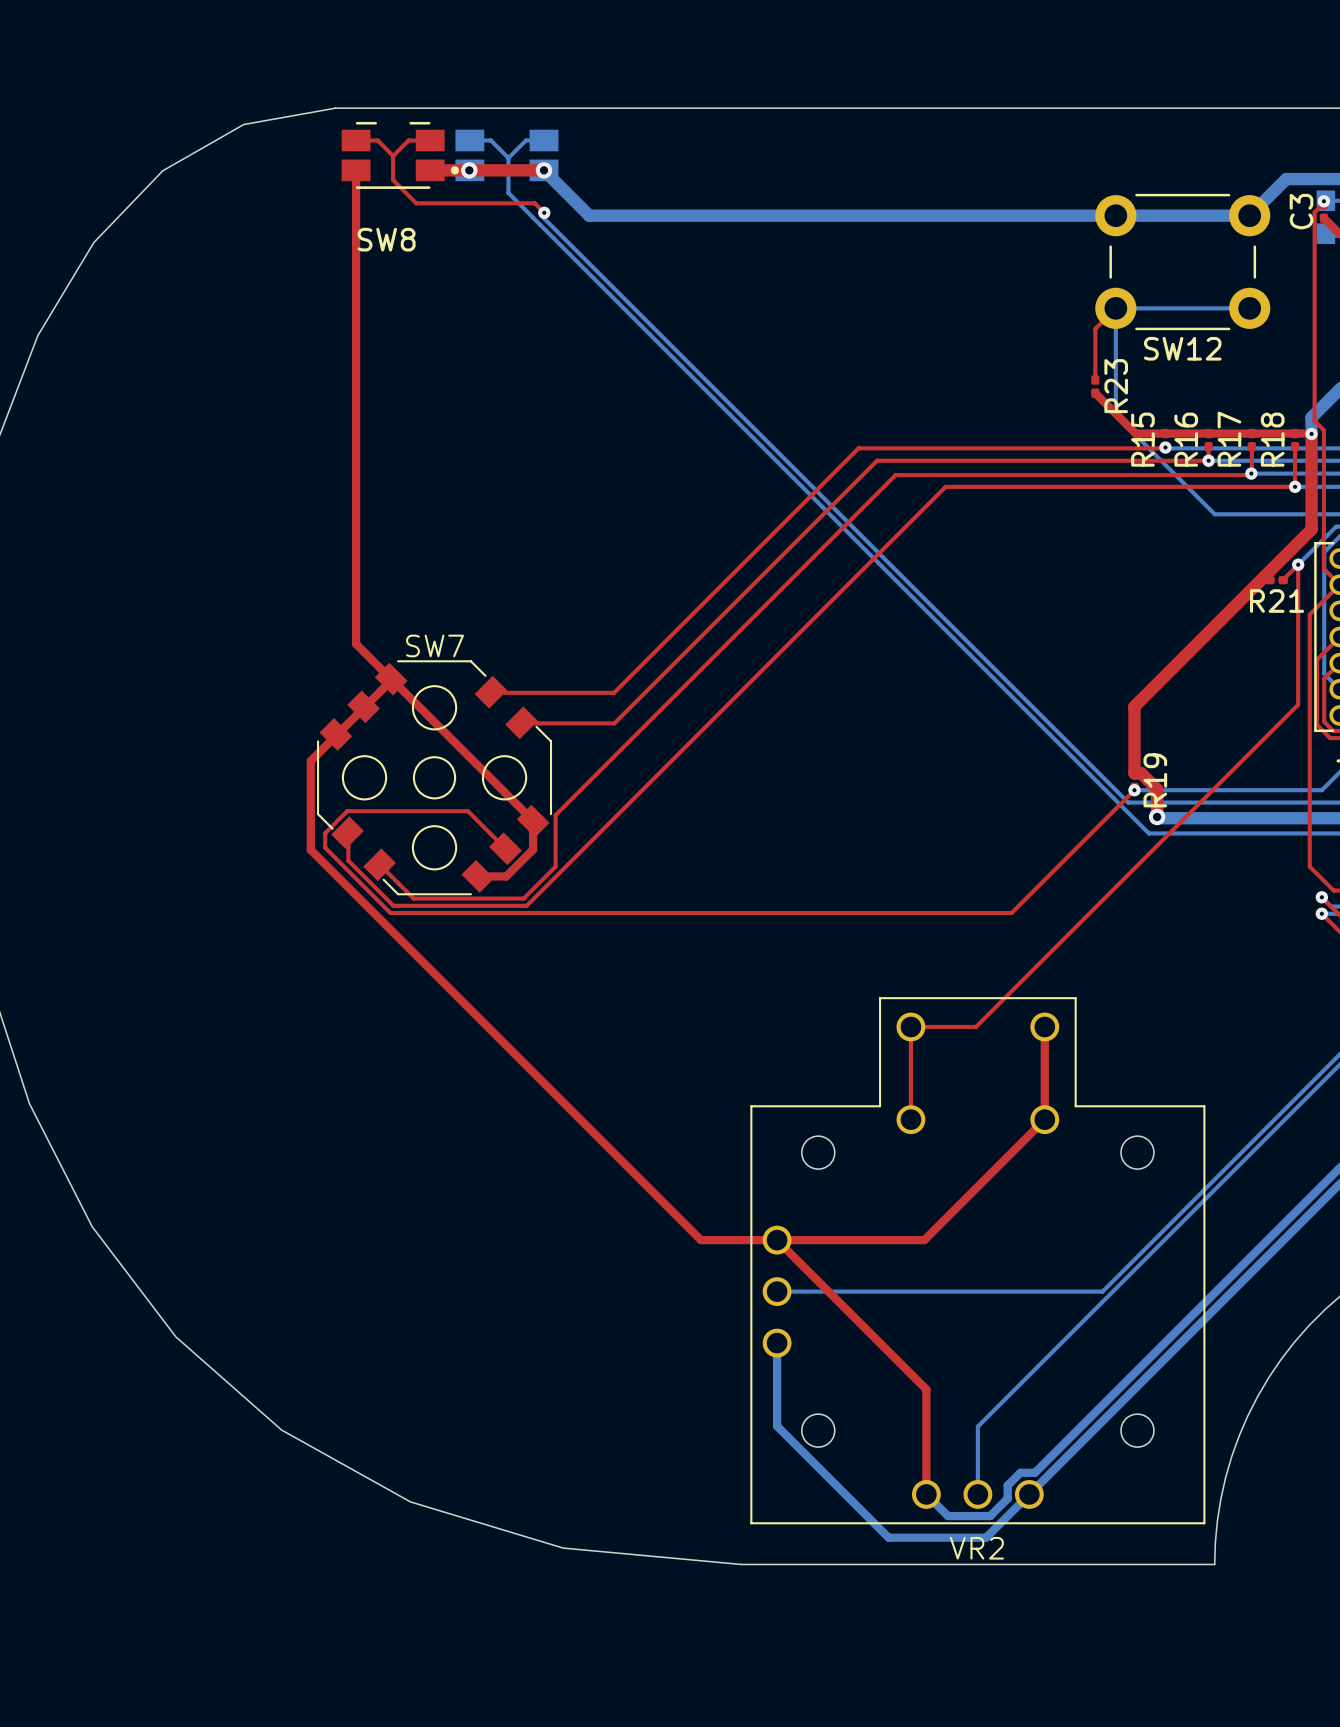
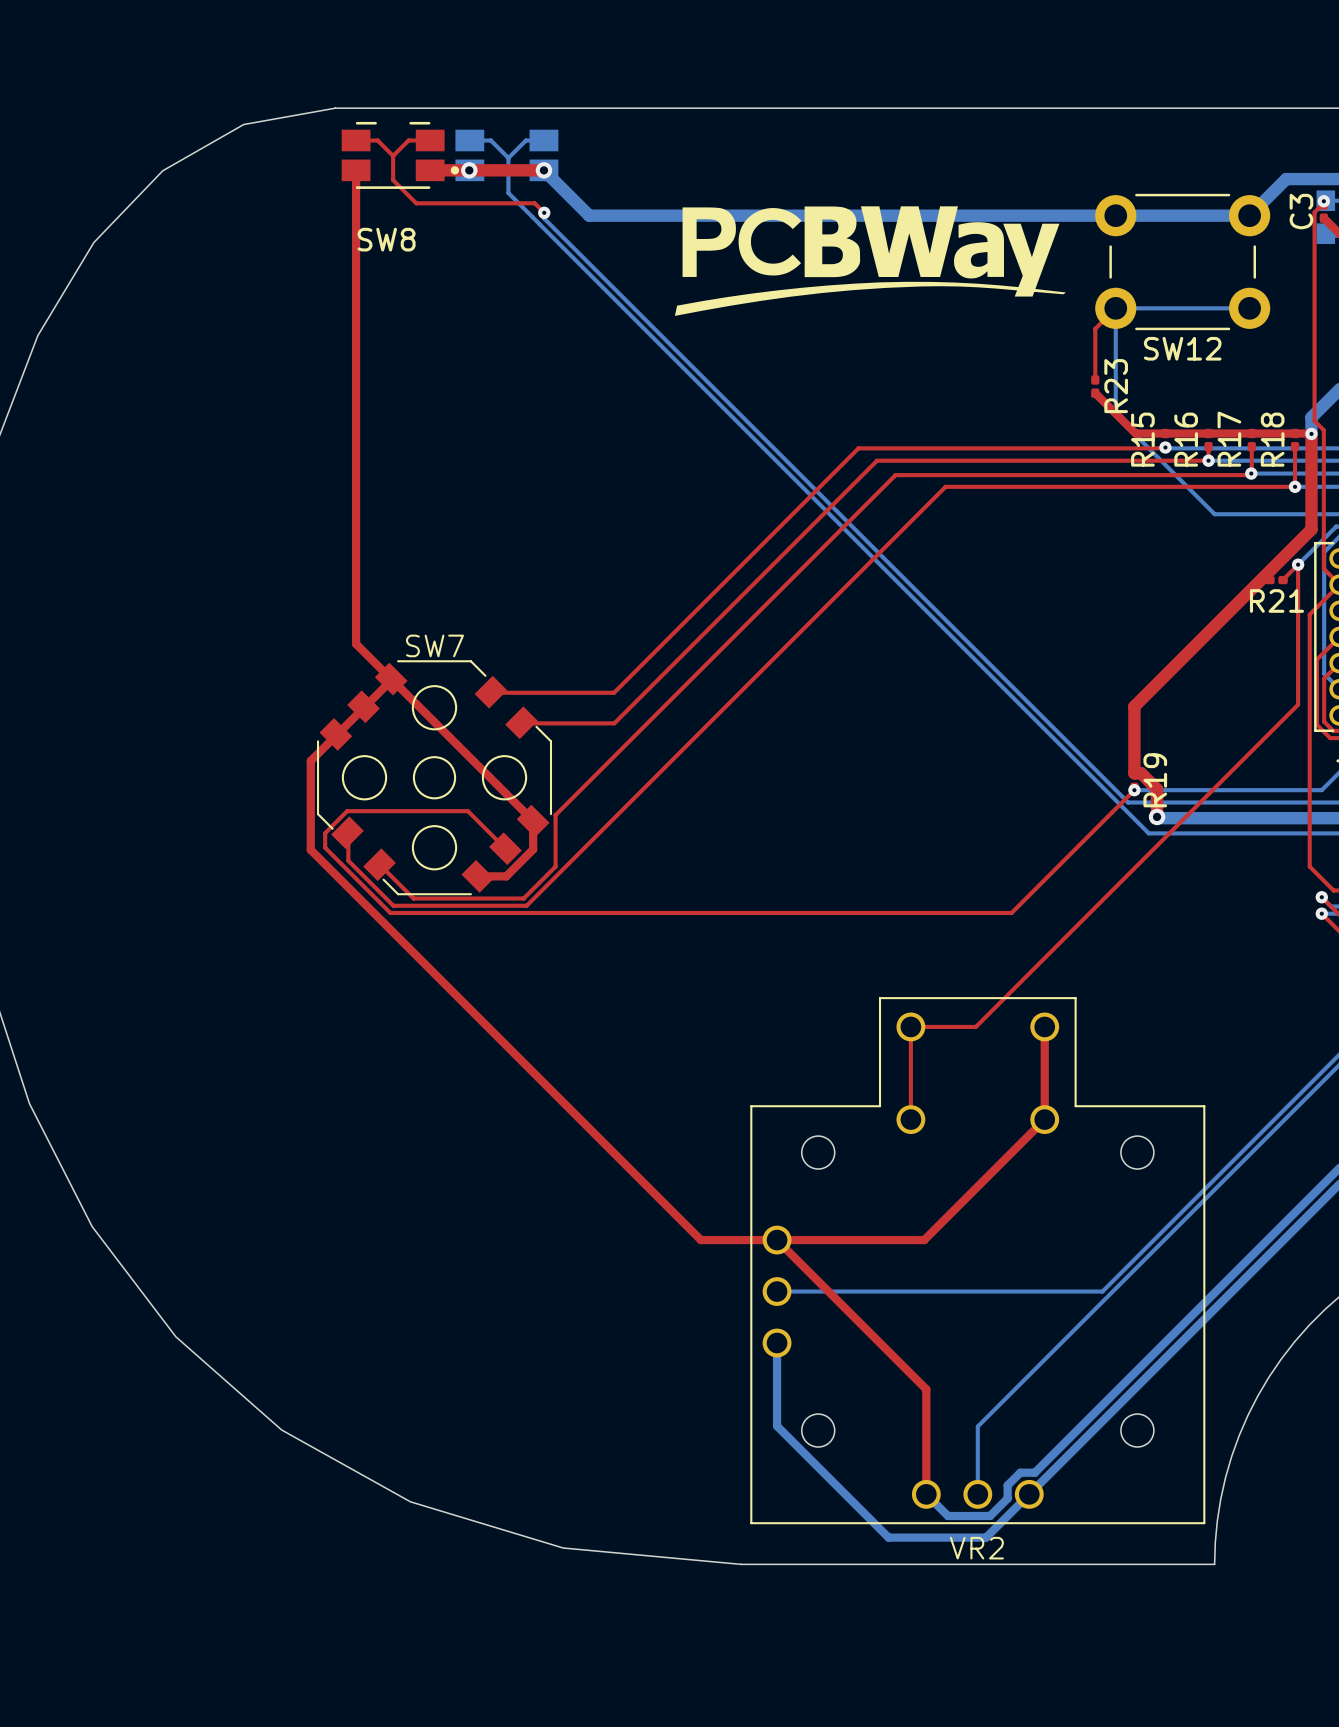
drawing: none -> [674, 206, 1066, 316]

